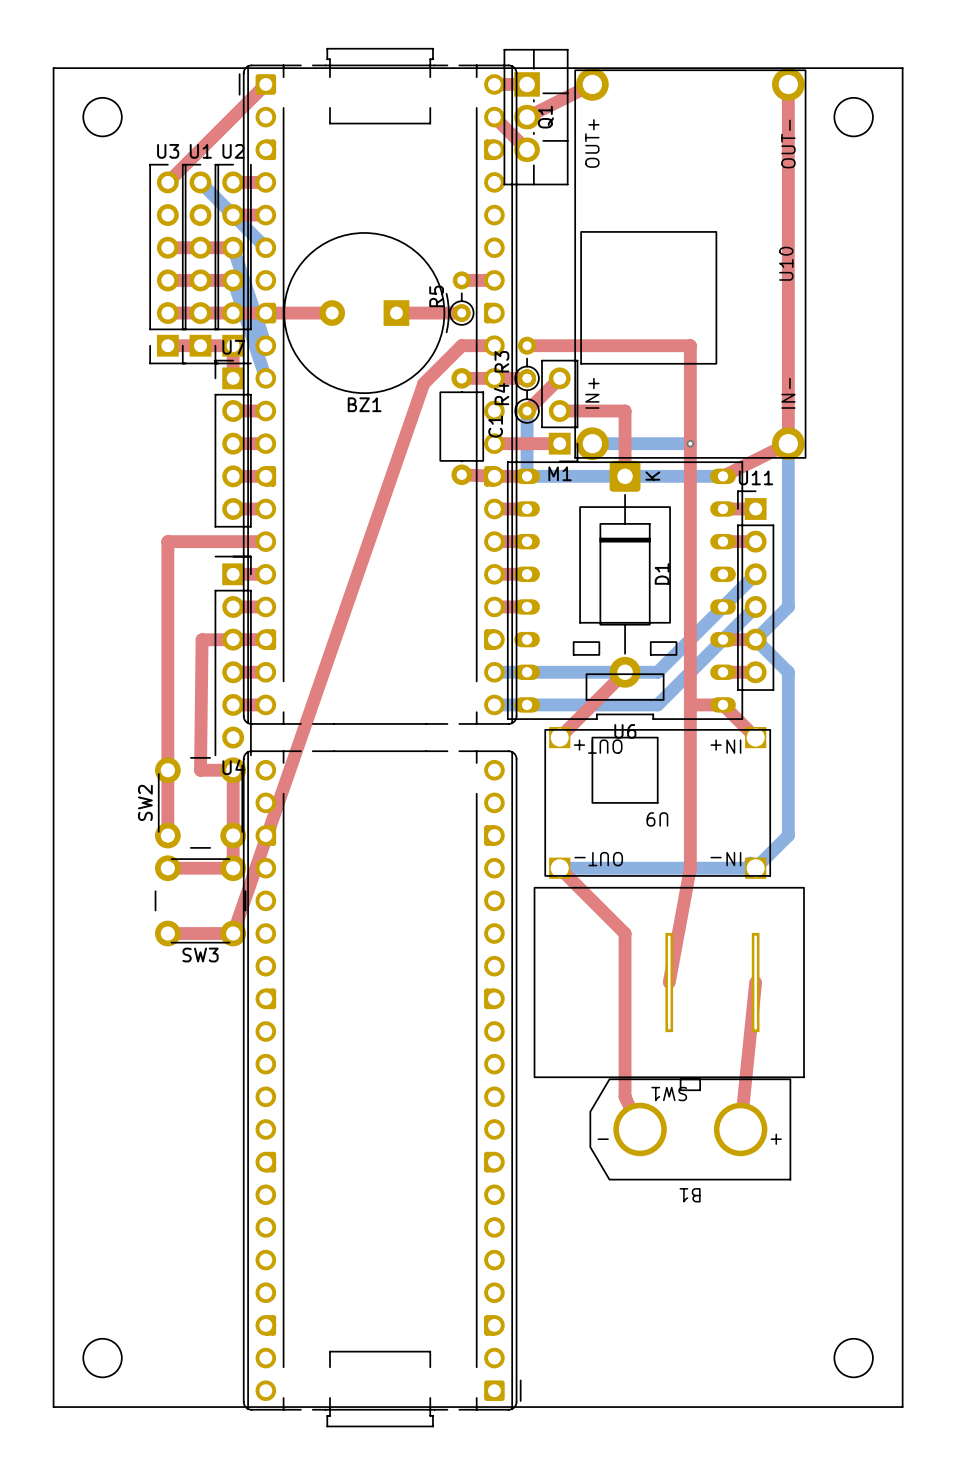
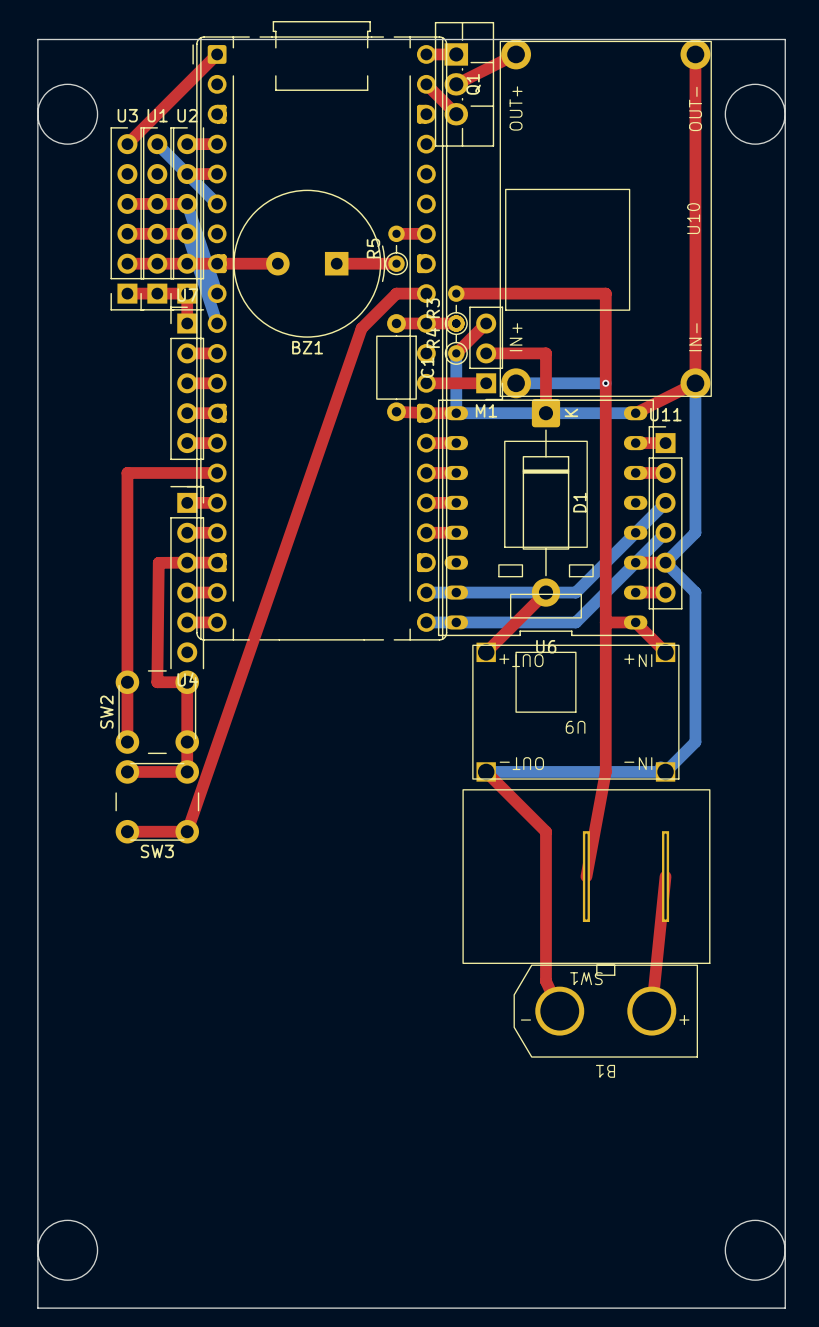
board edge: (70, 68) (53, 68) (53, 1407) (902, 1407) (902, 68) (886, 68) -> (37, 39) (37, 1308) (785, 1308) (785, 39)
round board edge: [82, 97, 123, 137] -> none
round board edge: [834, 97, 874, 137] -> none
round board edge: none -> [37, 84, 98, 145]
round board edge: none -> [725, 84, 786, 145]
part: (382, 1088) -> none
round board edge: [82, 1338, 123, 1378] -> none
round board edge: [834, 1338, 874, 1378] -> none
round board edge: none -> [37, 1220, 98, 1281]
round board edge: none -> [725, 1220, 786, 1281]

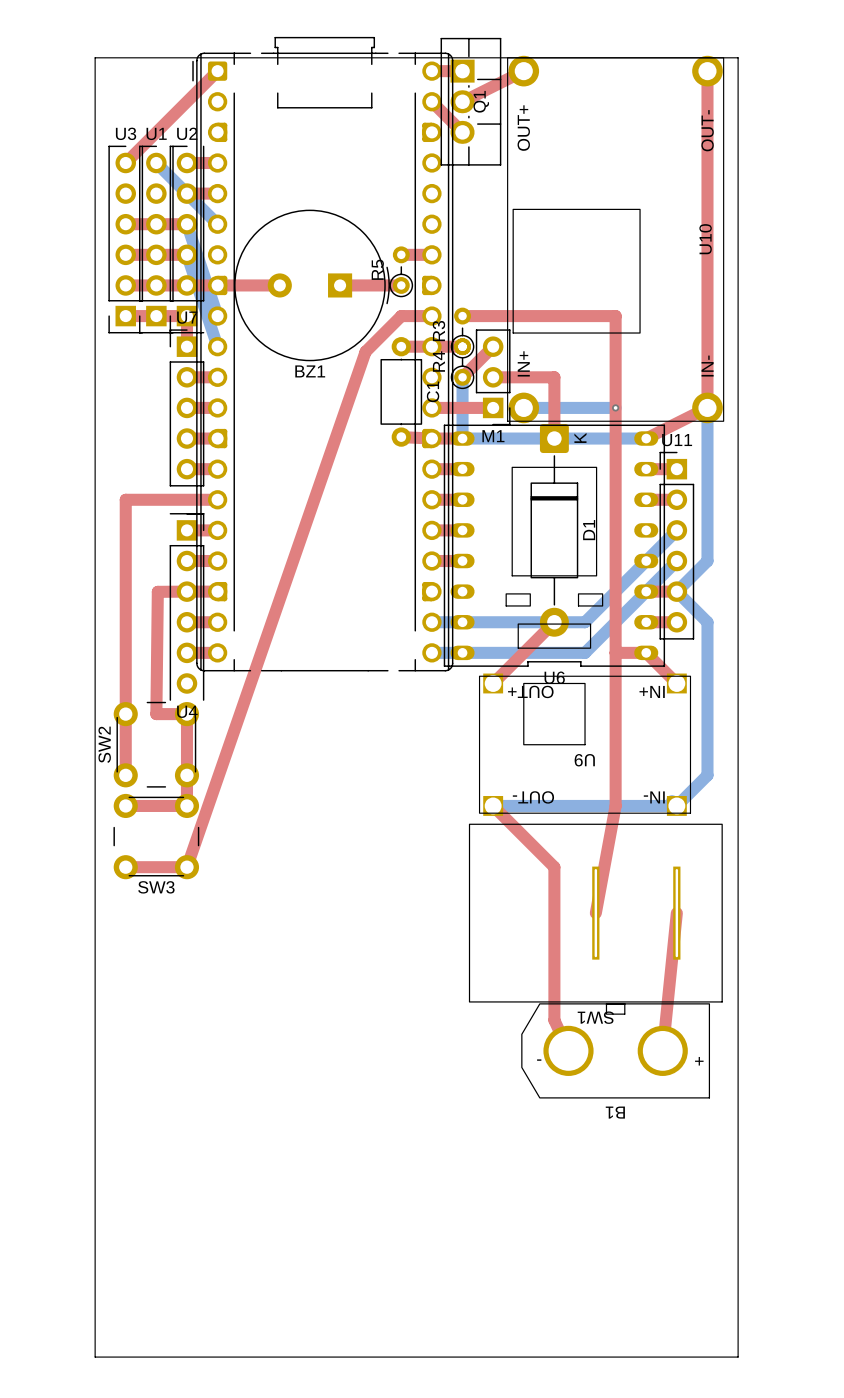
board edge: (37, 39) (785, 39) (785, 1308) (37, 1308) (37, 39) -> (95, 57) (95, 1357) (738, 1357) (738, 57) (95, 57)
round board edge: [37, 84, 98, 145] -> none
round board edge: [725, 84, 786, 145] -> none
round board edge: [37, 1220, 98, 1281] -> none
round board edge: [725, 1220, 786, 1281] -> none

